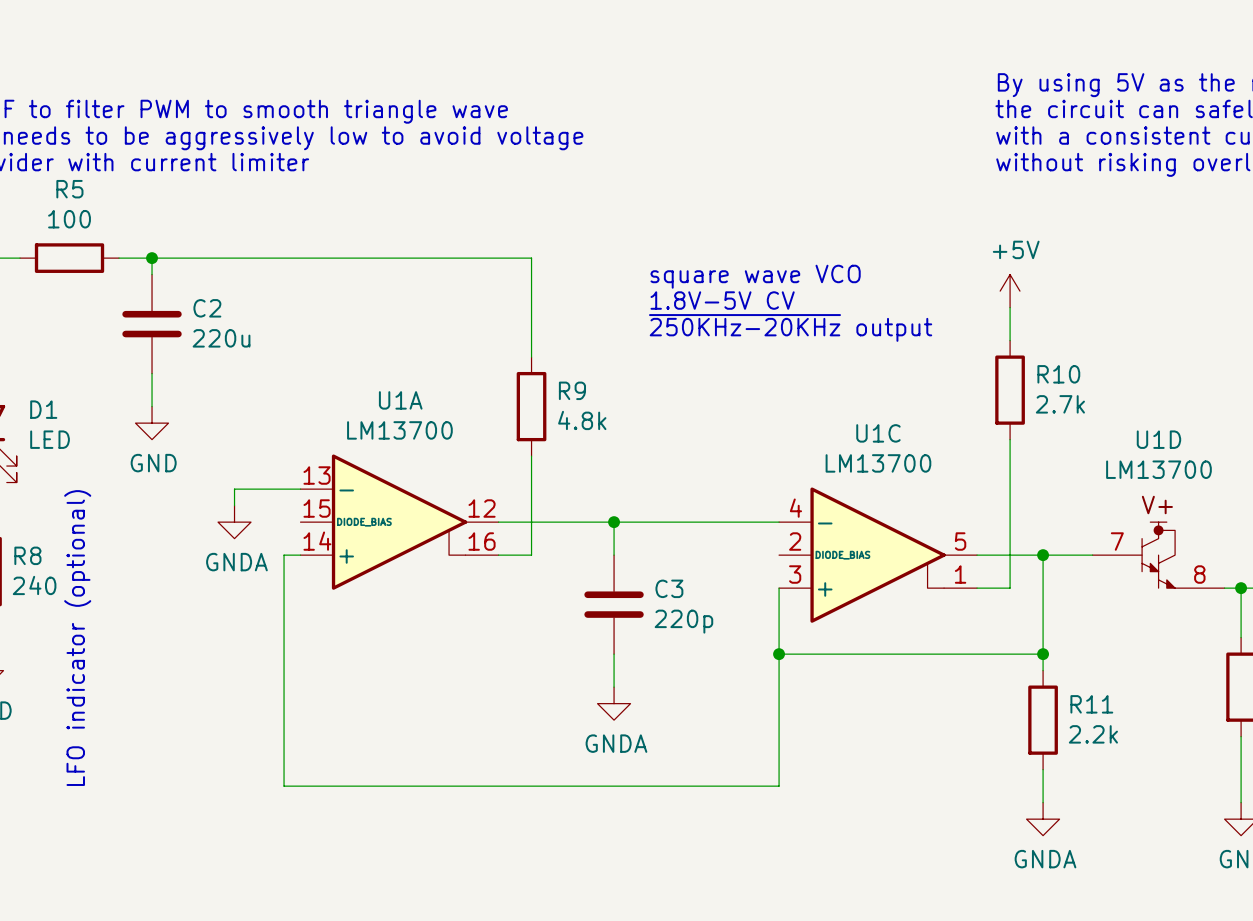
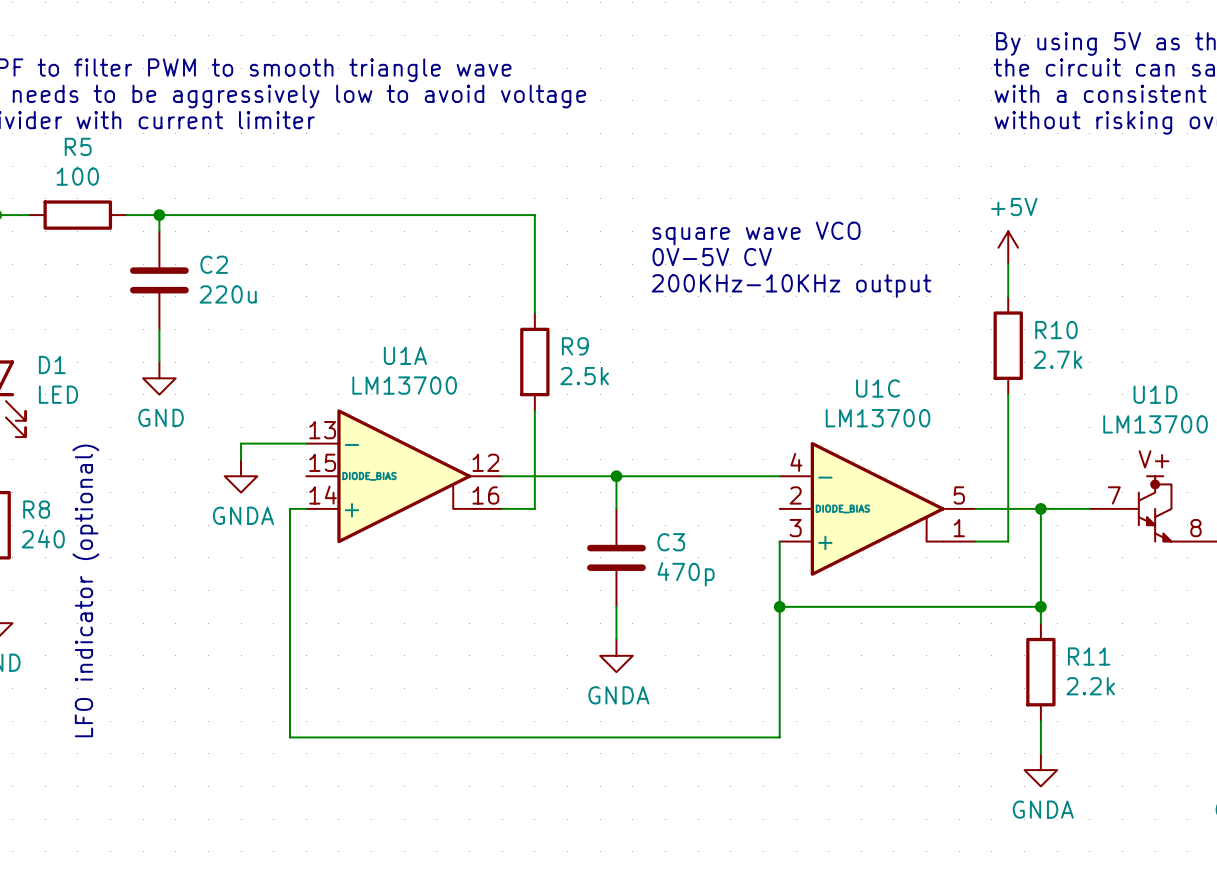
text: 1.8V-5V CV (722, 300) -> 0V-5V CV (712, 257)
text: ~{250KHz-20KHz} output (790, 327) -> 200KHz-10KHz output (791, 286)
R9 value: 4.8k (582, 420) -> 2.5k (584, 376)
C3 value: 220p (683, 621) -> 470p (686, 574)

